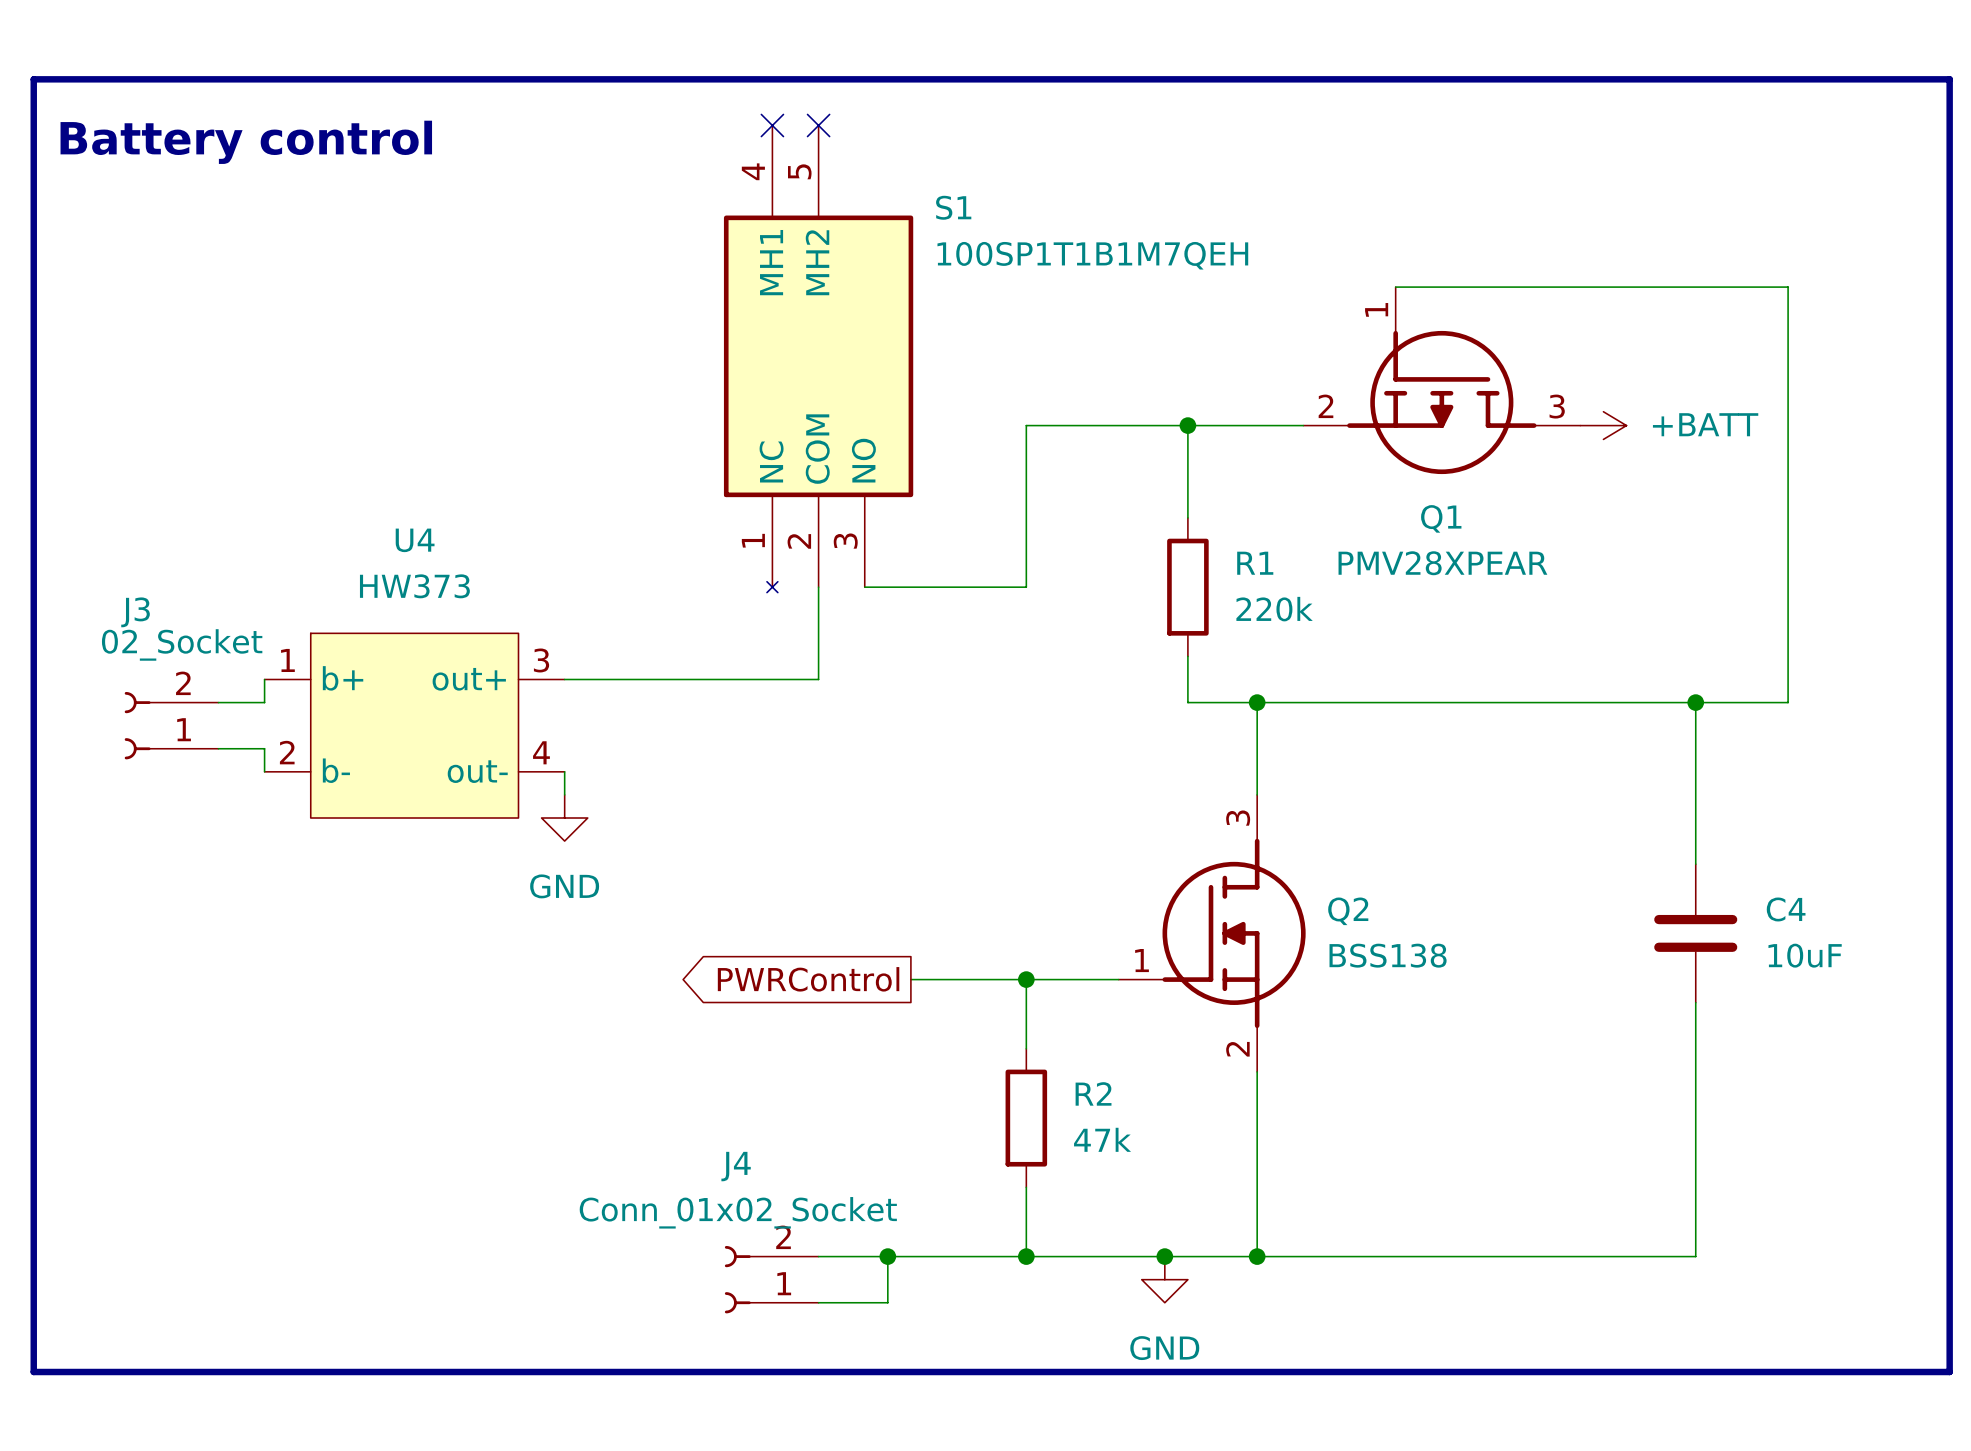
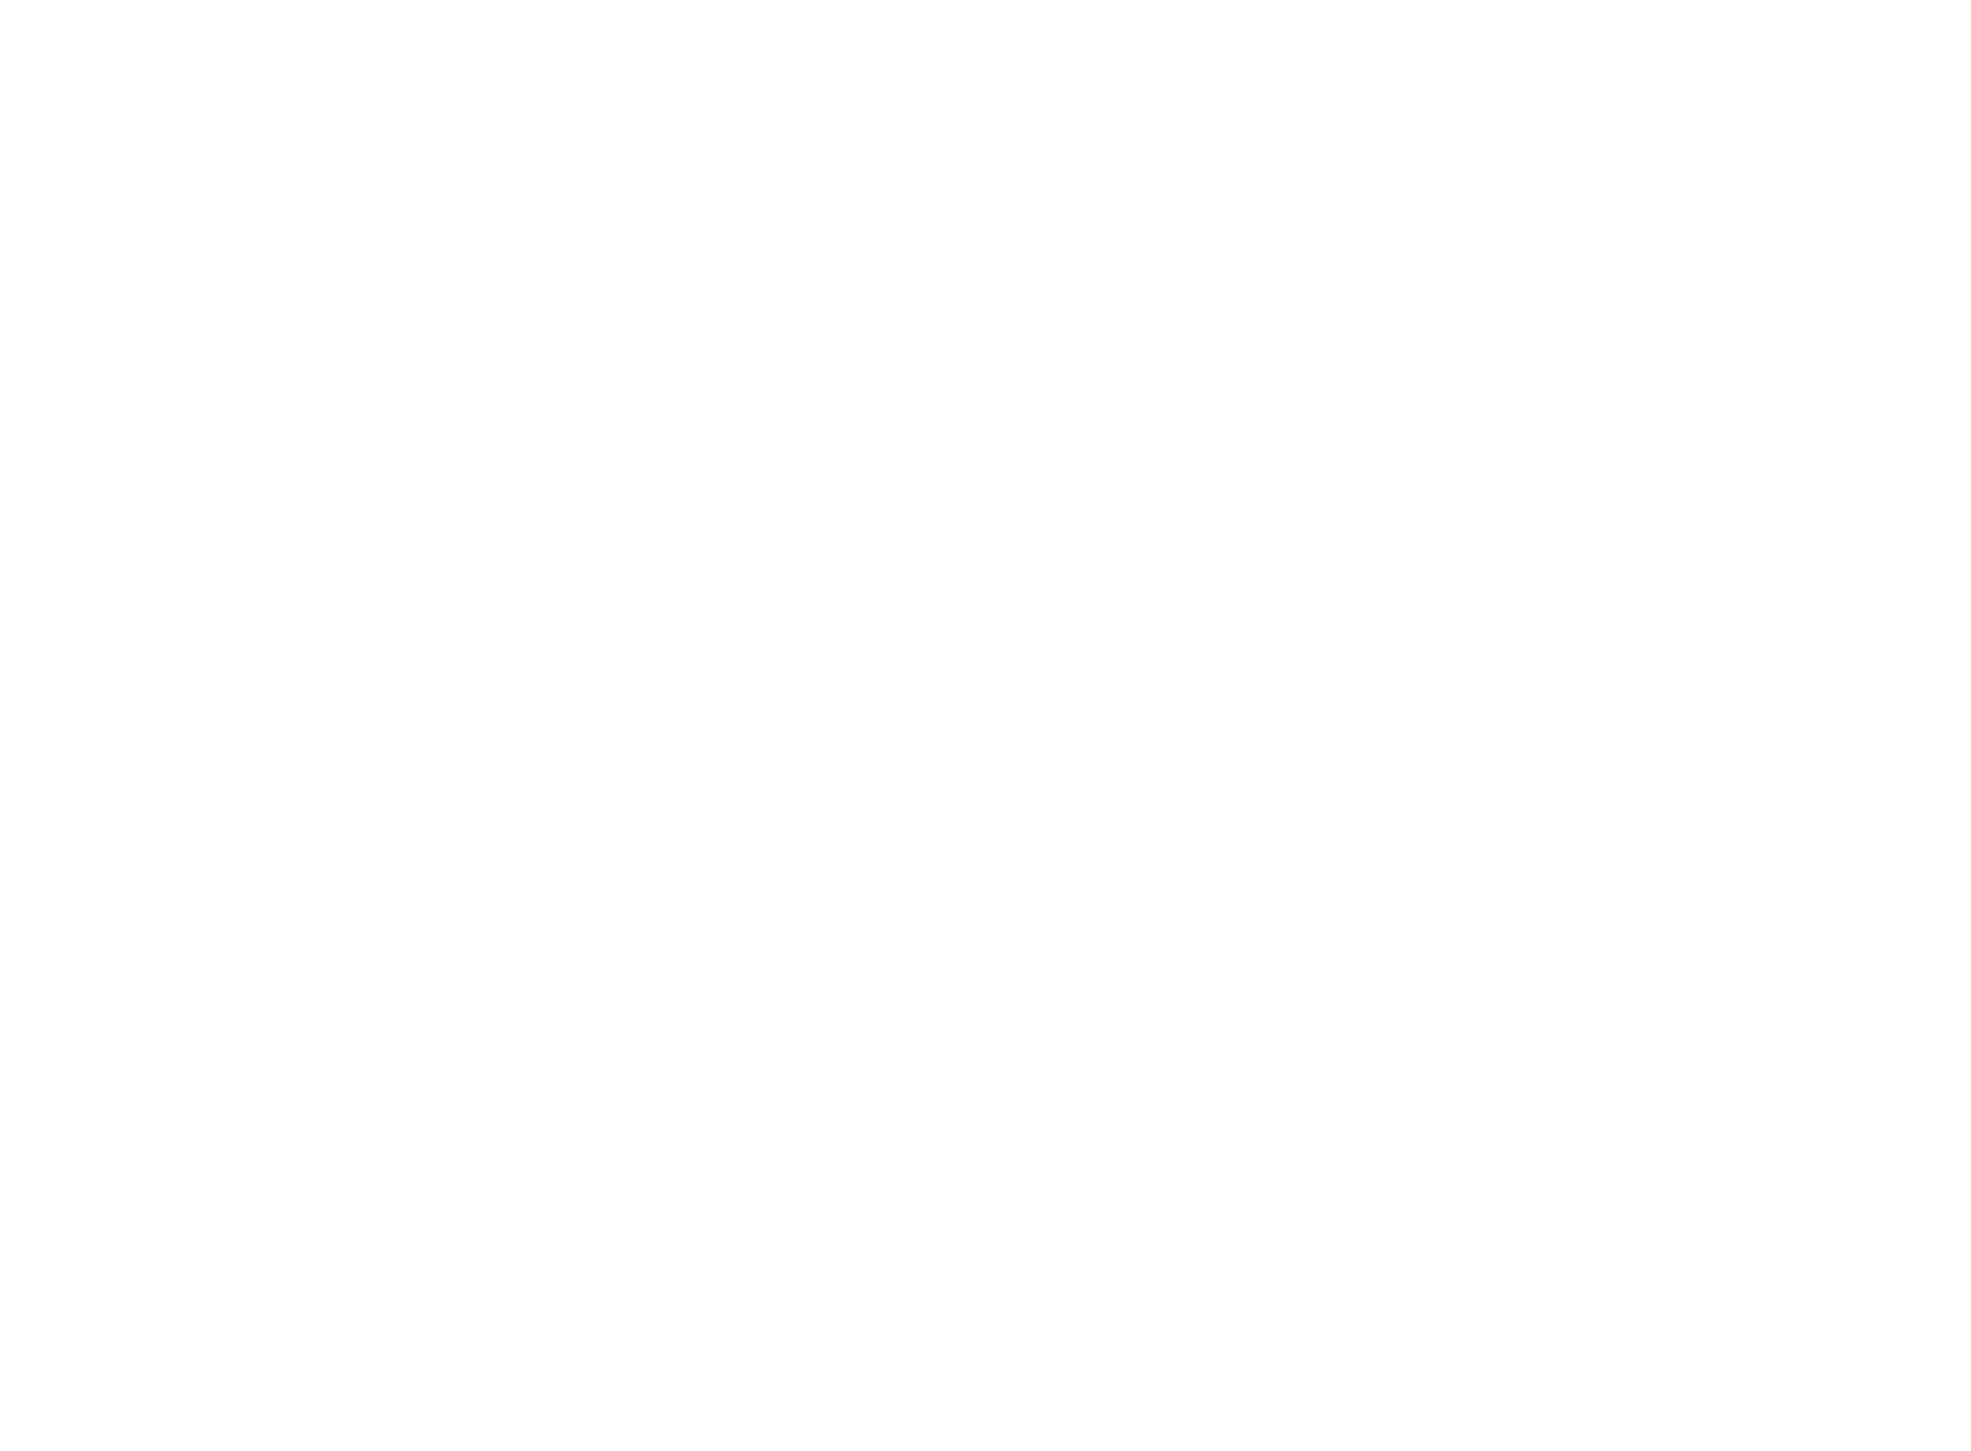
line: (33, 79) (1949, 79) (1949, 1372) (33, 1372) (33, 79) -> none
no-connect mark: (772, 125) -> none
no-connect mark: (818, 125) -> none
text: Battery control (246, 142) -> none
wire: (1395, 287) (1788, 287) (1788, 702) (1187, 702) (1187, 656) -> none
S1: 100SP1T1B1M7QEH (818, 359) -> none
Q1: PMV28XPEAR (1441, 380) -> none
wire: (1187, 425) (1187, 517) -> none
junction: (1187, 425) -> none
wire: (1303, 425) (1026, 425) (1026, 587) (864, 587) -> none
power symbol: +BATT (1603, 425) -> none
wire: (818, 587) (818, 679) (564, 679) -> none
R1: 220k (1187, 587) -> none
wire: (264, 679) (264, 702) (218, 702) -> none
wire: (1257, 702) (1257, 794) -> none
junction: (1257, 702) -> none
wire: (1695, 702) (1695, 864) -> none
junction: (1695, 702) -> none
J3: 02_Socket (171, 725) -> none
U4: HW373 (414, 725) -> none
wire: (218, 748) (264, 748) (264, 771) -> none
wire: (564, 771) (564, 794) -> none
power symbol: GND (564, 818) -> none
Q2: BSS138 (1212, 933) -> none
C4: 10uF (1695, 933) -> none
global label: PWRControl (808, 979) -> none
wire: (910, 979) (1118, 979) -> none
wire: (1026, 979) (1026, 1048) -> none
junction: (1026, 979) -> none
wire: (1695, 1002) (1695, 1256) (818, 1256) -> none
wire: (1257, 1071) (1257, 1256) -> none
R2: 47k (1026, 1118) -> none
wire: (1026, 1187) (1026, 1256) -> none
wire: (887, 1256) (887, 1302) (818, 1302) -> none
junction: (887, 1256) -> none
junction: (1026, 1256) -> none
junction: (1164, 1256) -> none
junction: (1257, 1256) -> none
J4: Conn_01x02_Socket (771, 1279) -> none
power symbol: GND (1164, 1279) -> none

